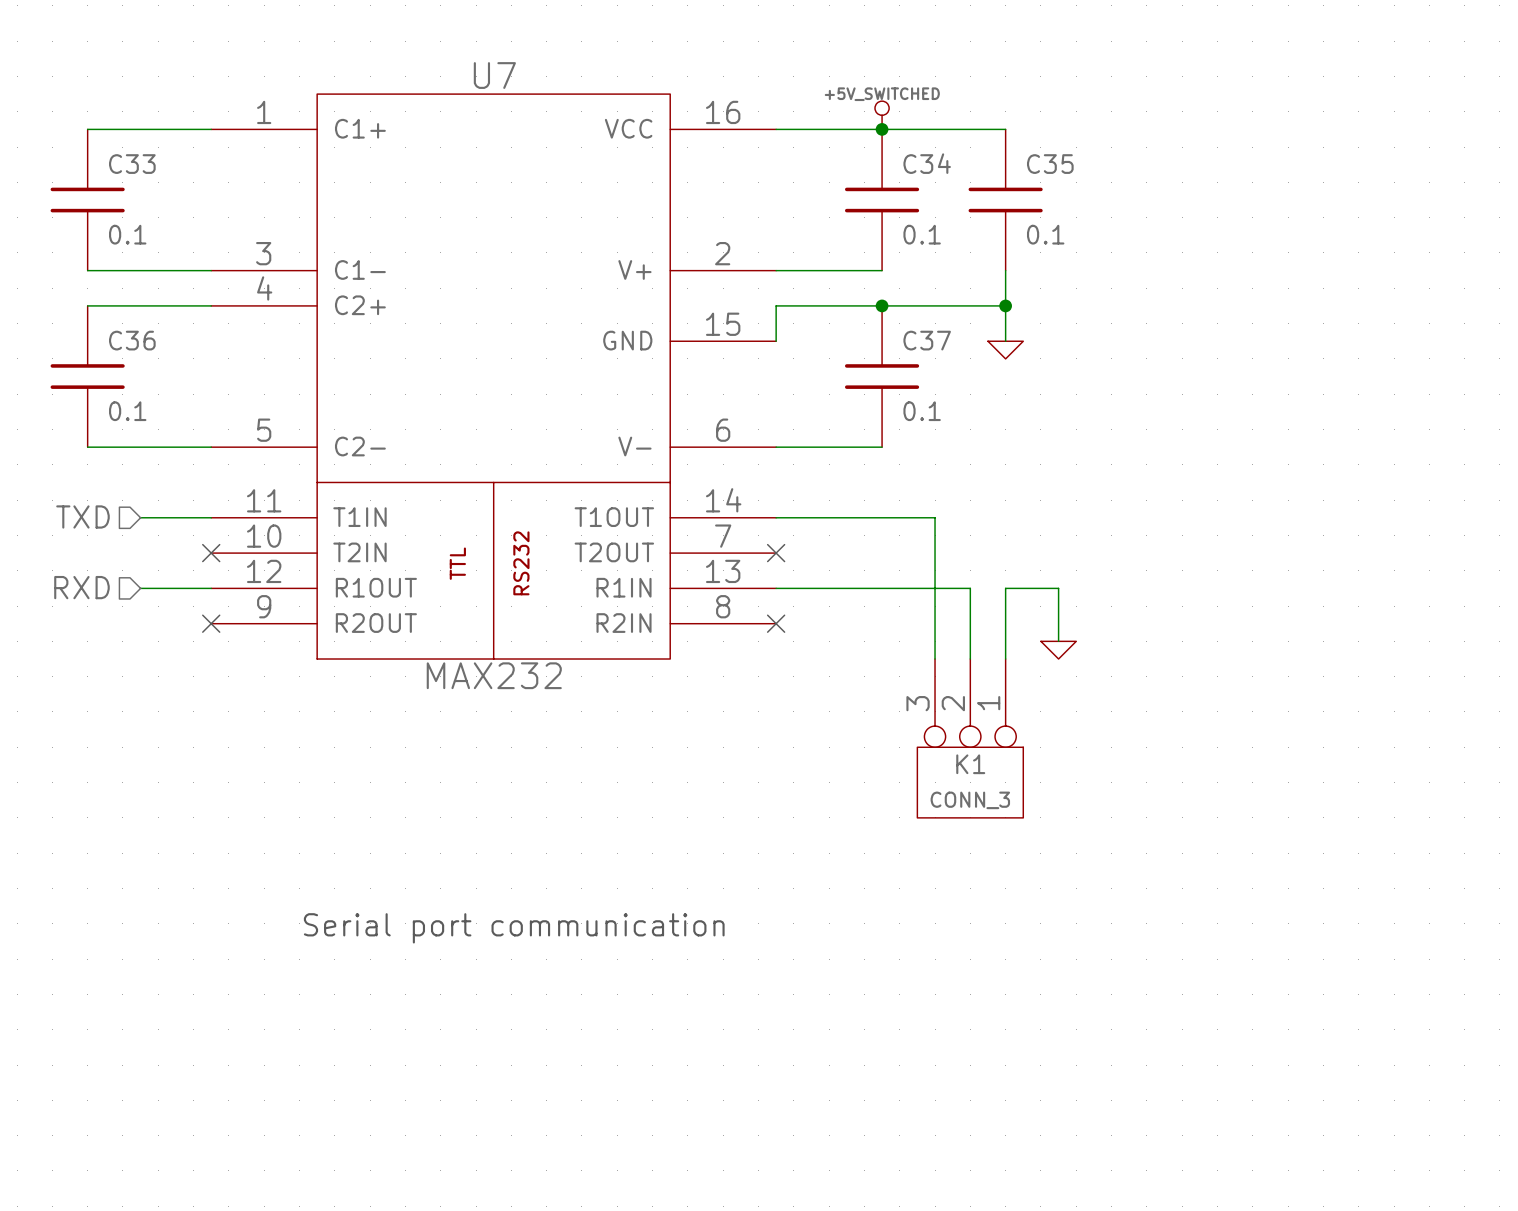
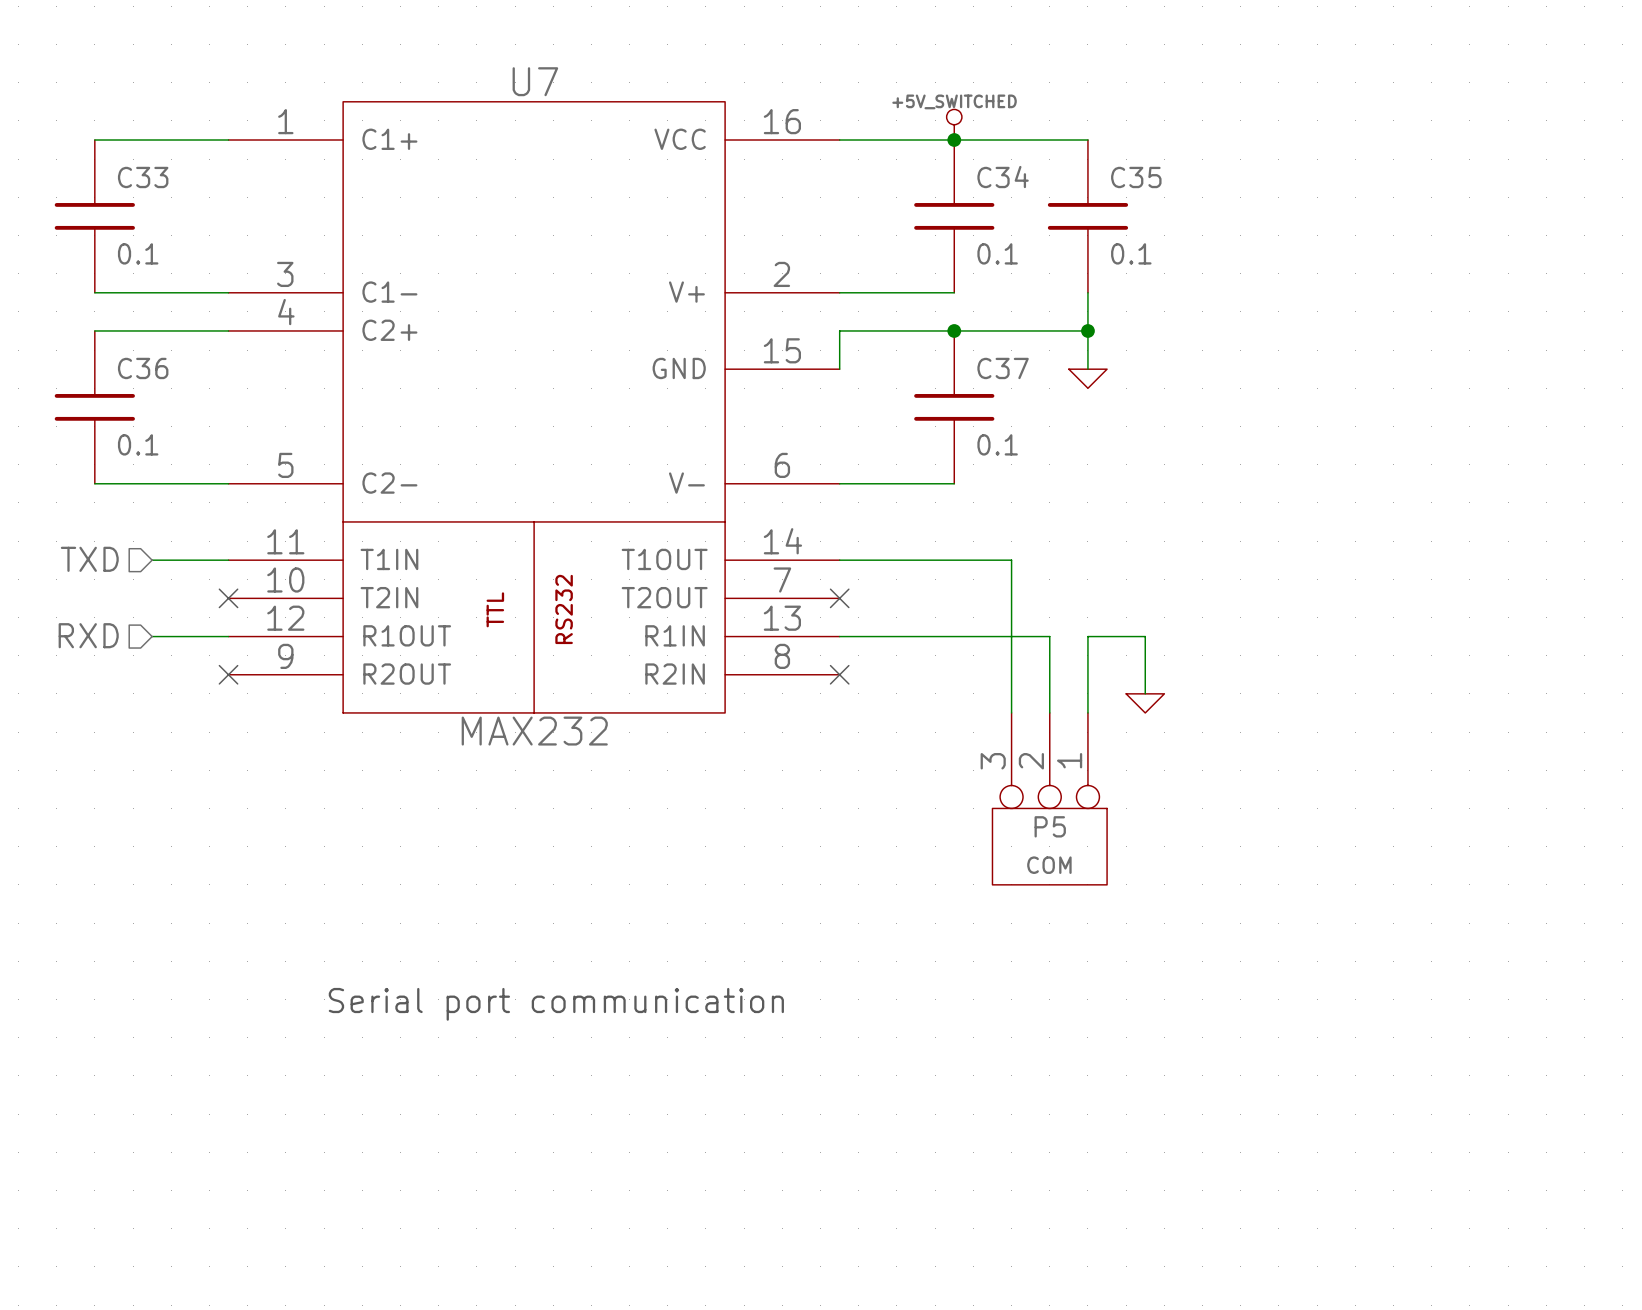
K1 name: K1 (970, 764) -> P5 (1050, 826)
K1 value: CONN_3 (970, 800) -> COM (1049, 865)

